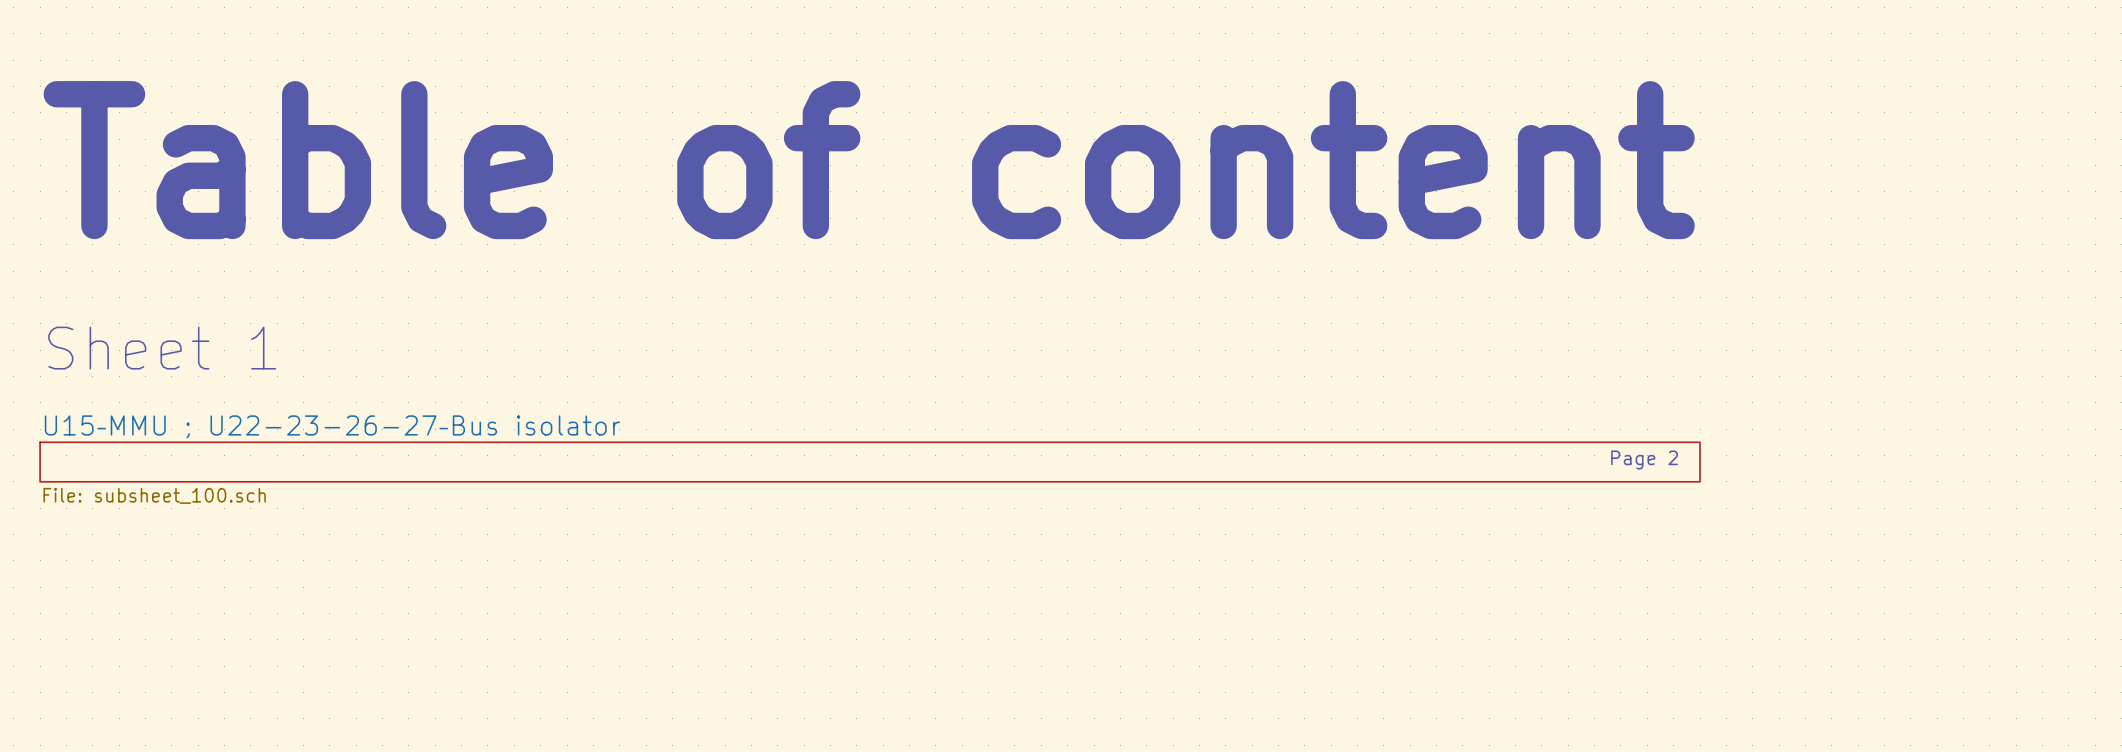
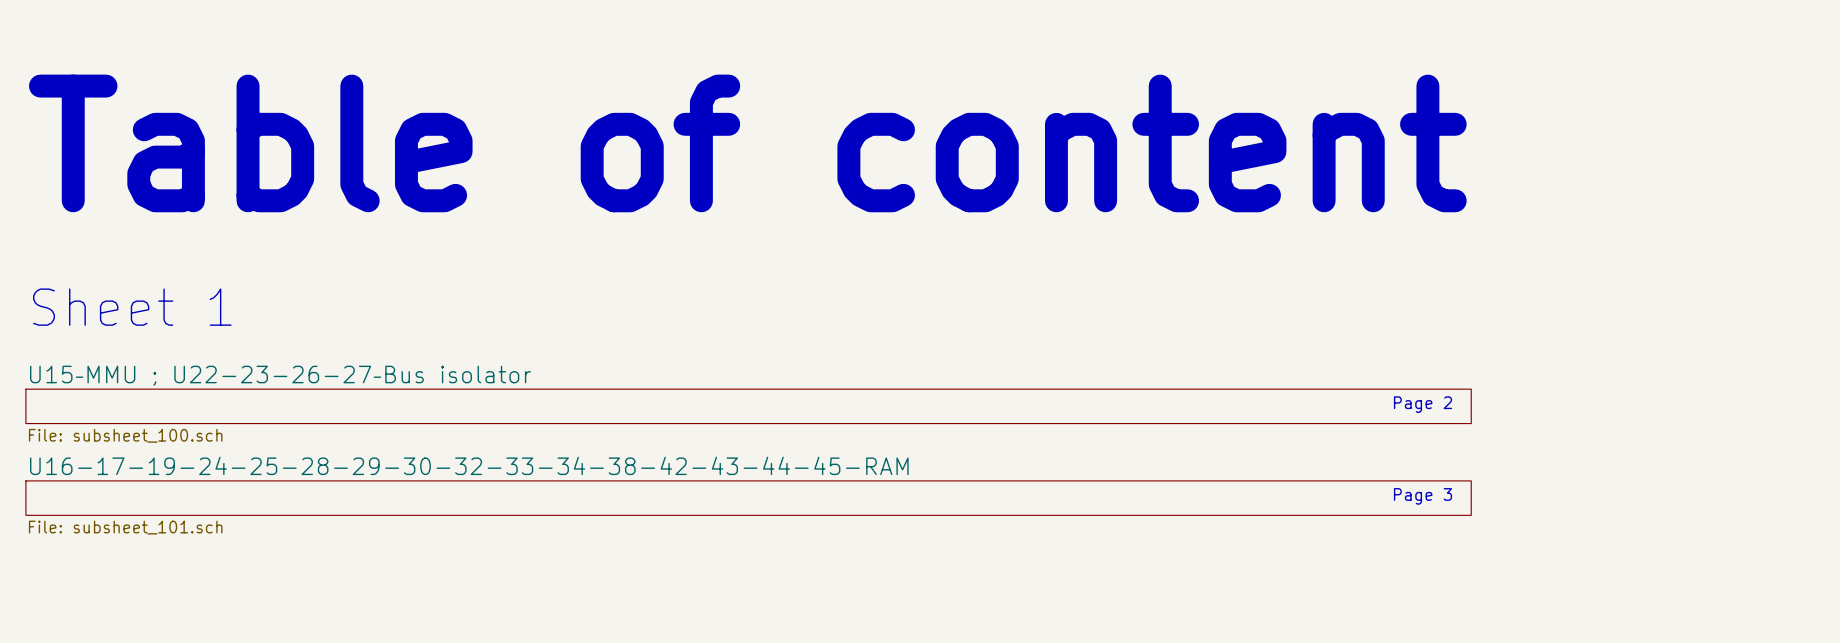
text: none -> Page 3 (1422, 496)
sheet U16-17-19-24-25-28-29-30-32-33-34-38-42-43-44-45-RAM: none -> File: subsheet_101.sch (748, 498)

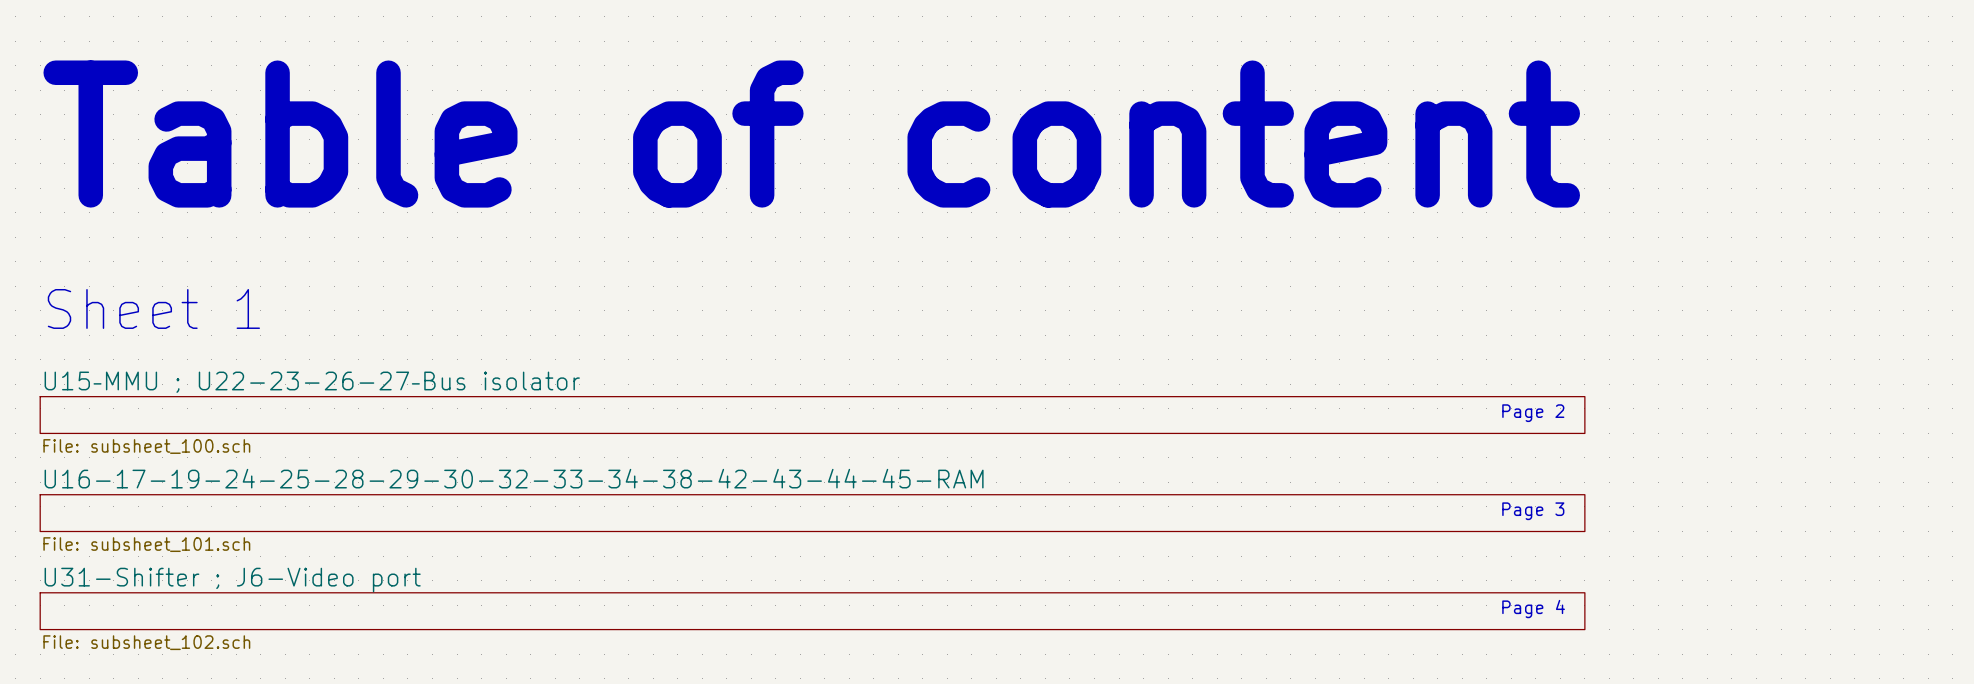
text: none -> Page 4 (1533, 609)
sheet U31-Shifter ; J6-Video port: none -> File: subsheet_102.sch (812, 611)

